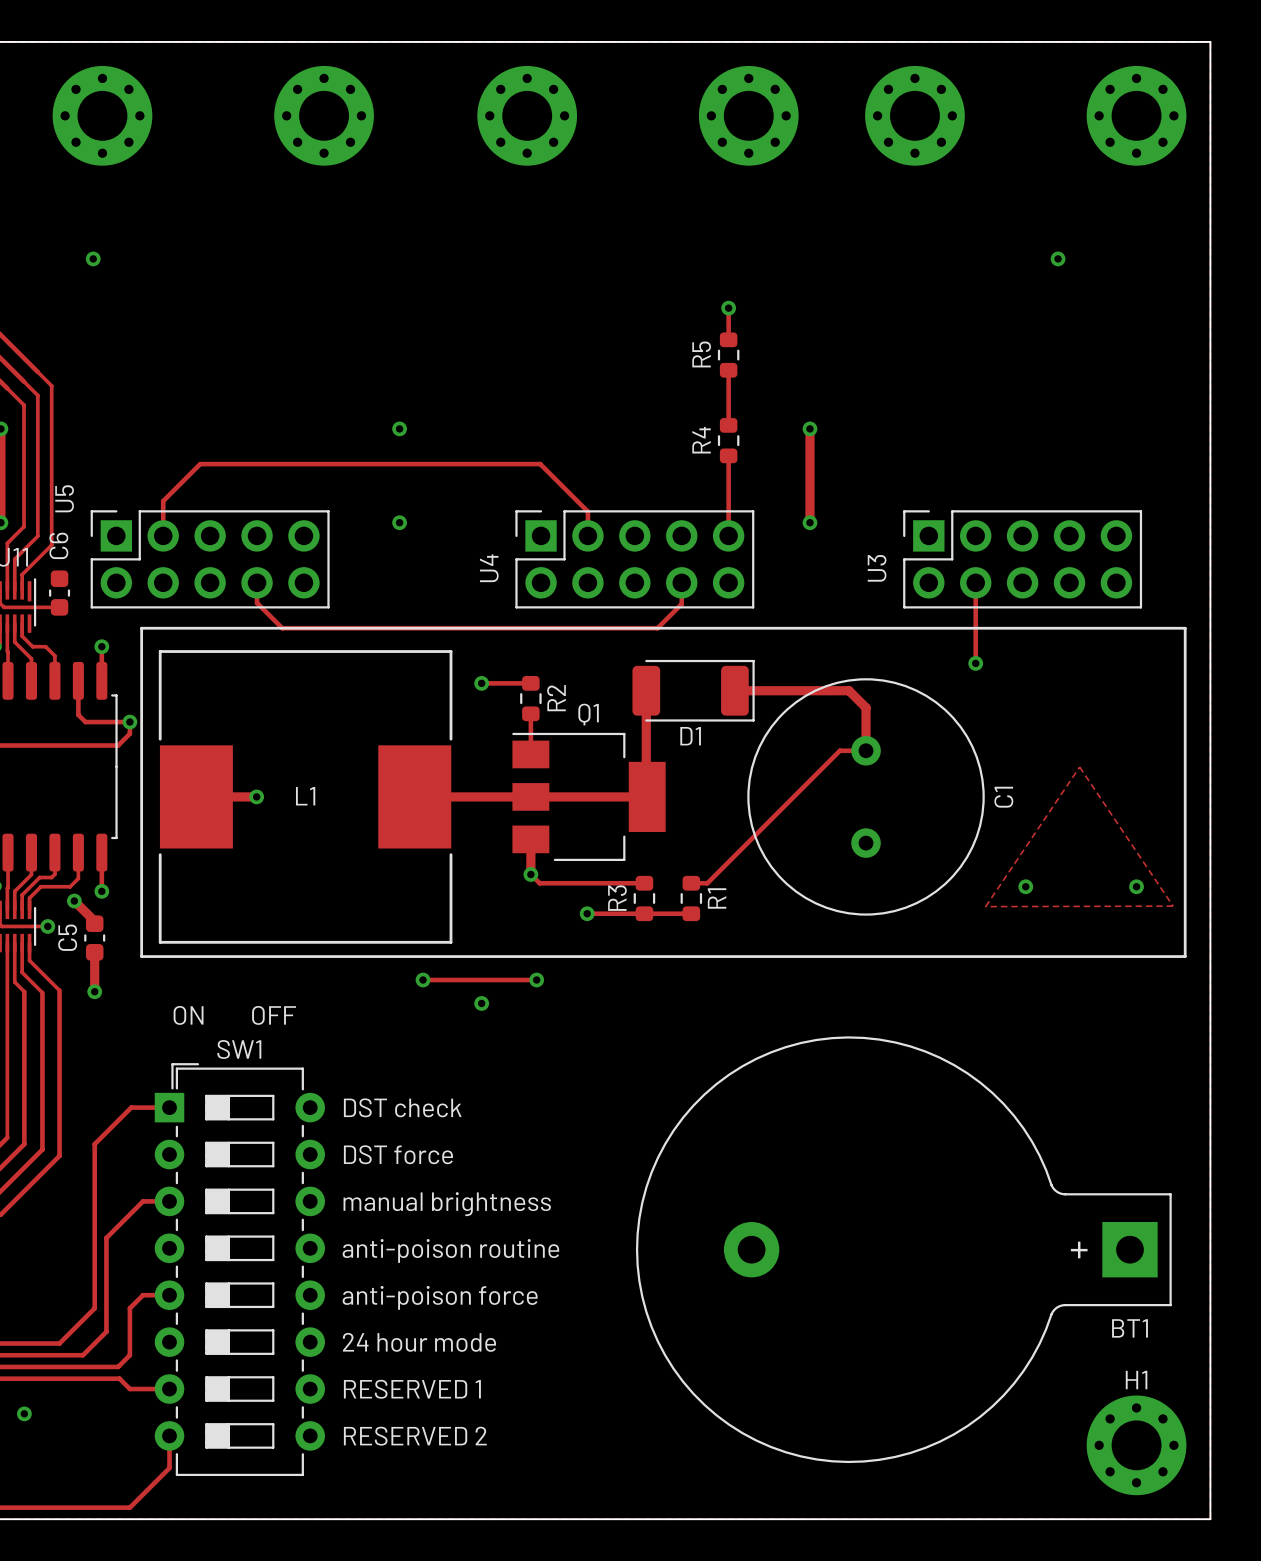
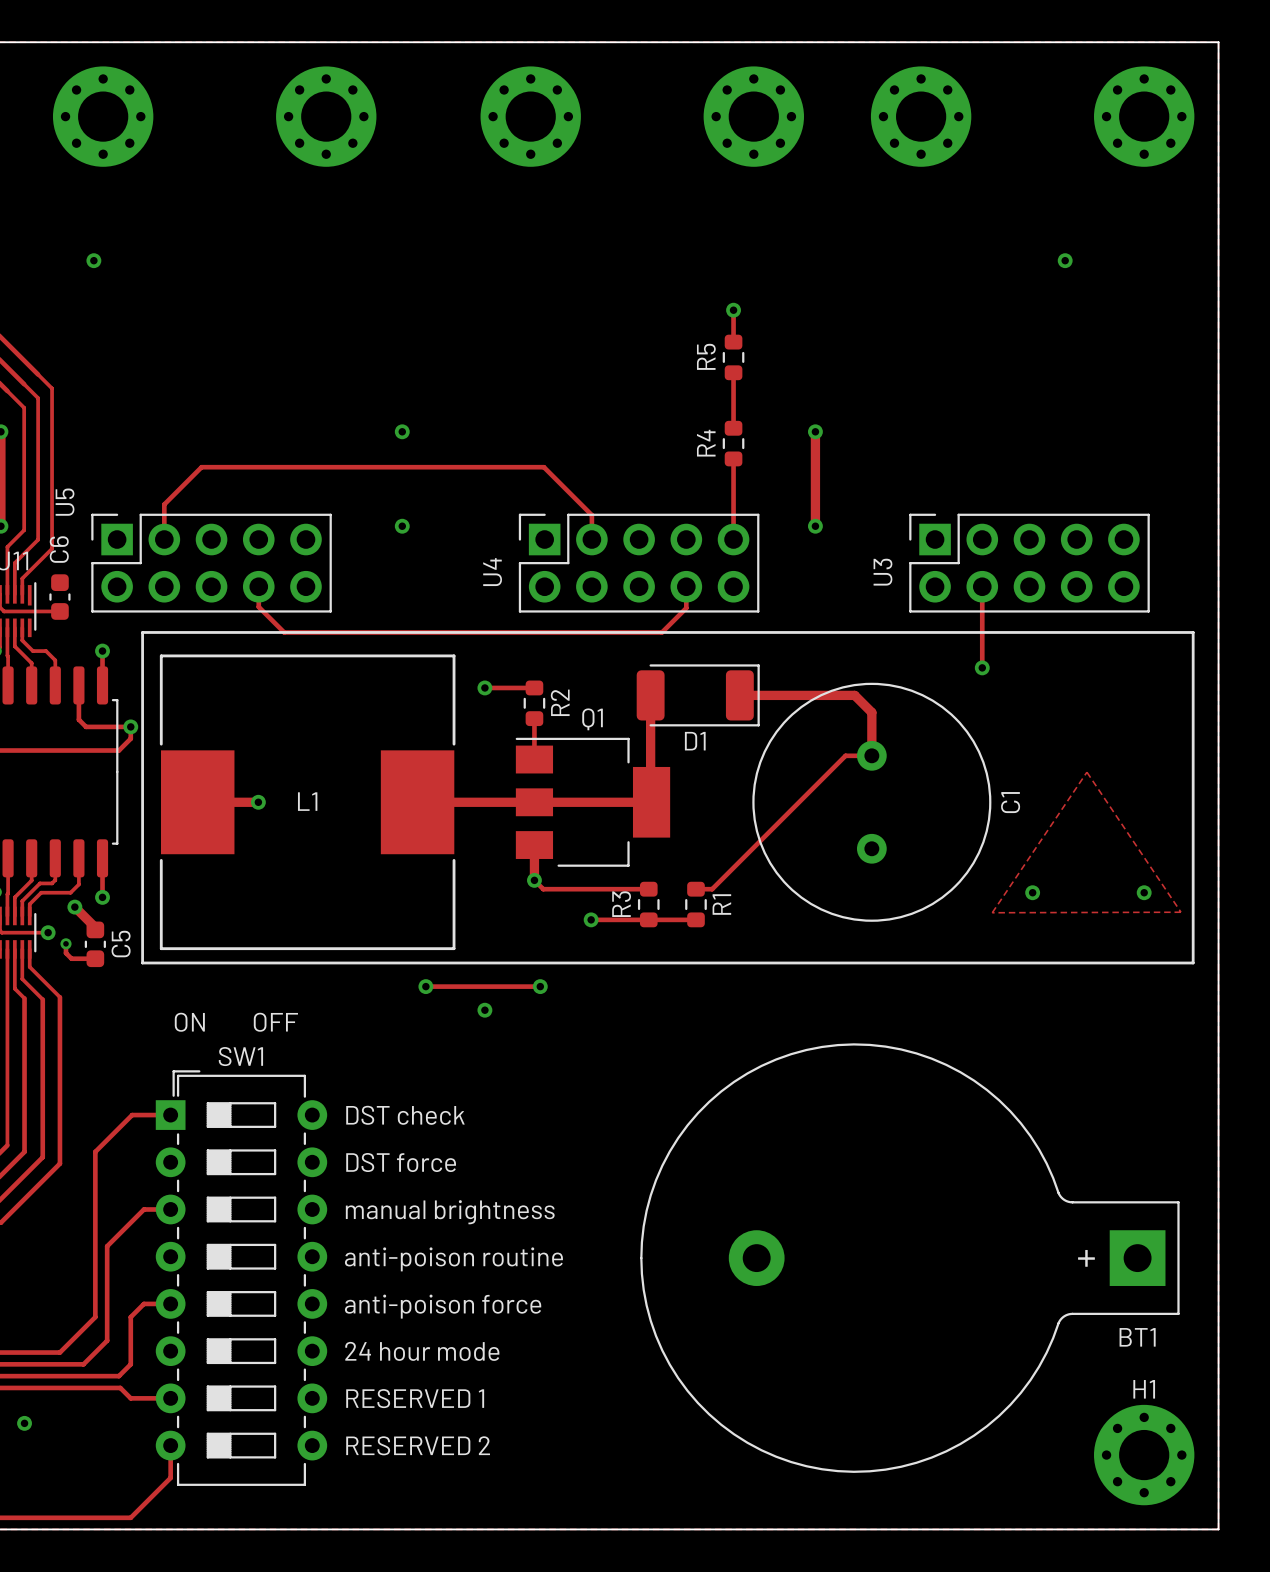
via: none -> (65, 943)
C5 name position: C5 (67, 937) -> C5 (121, 944)
track: (94, 952) (94, 991) -> (95, 958) (71, 958) (65, 953) (65, 943)
via: (94, 991) -> none

